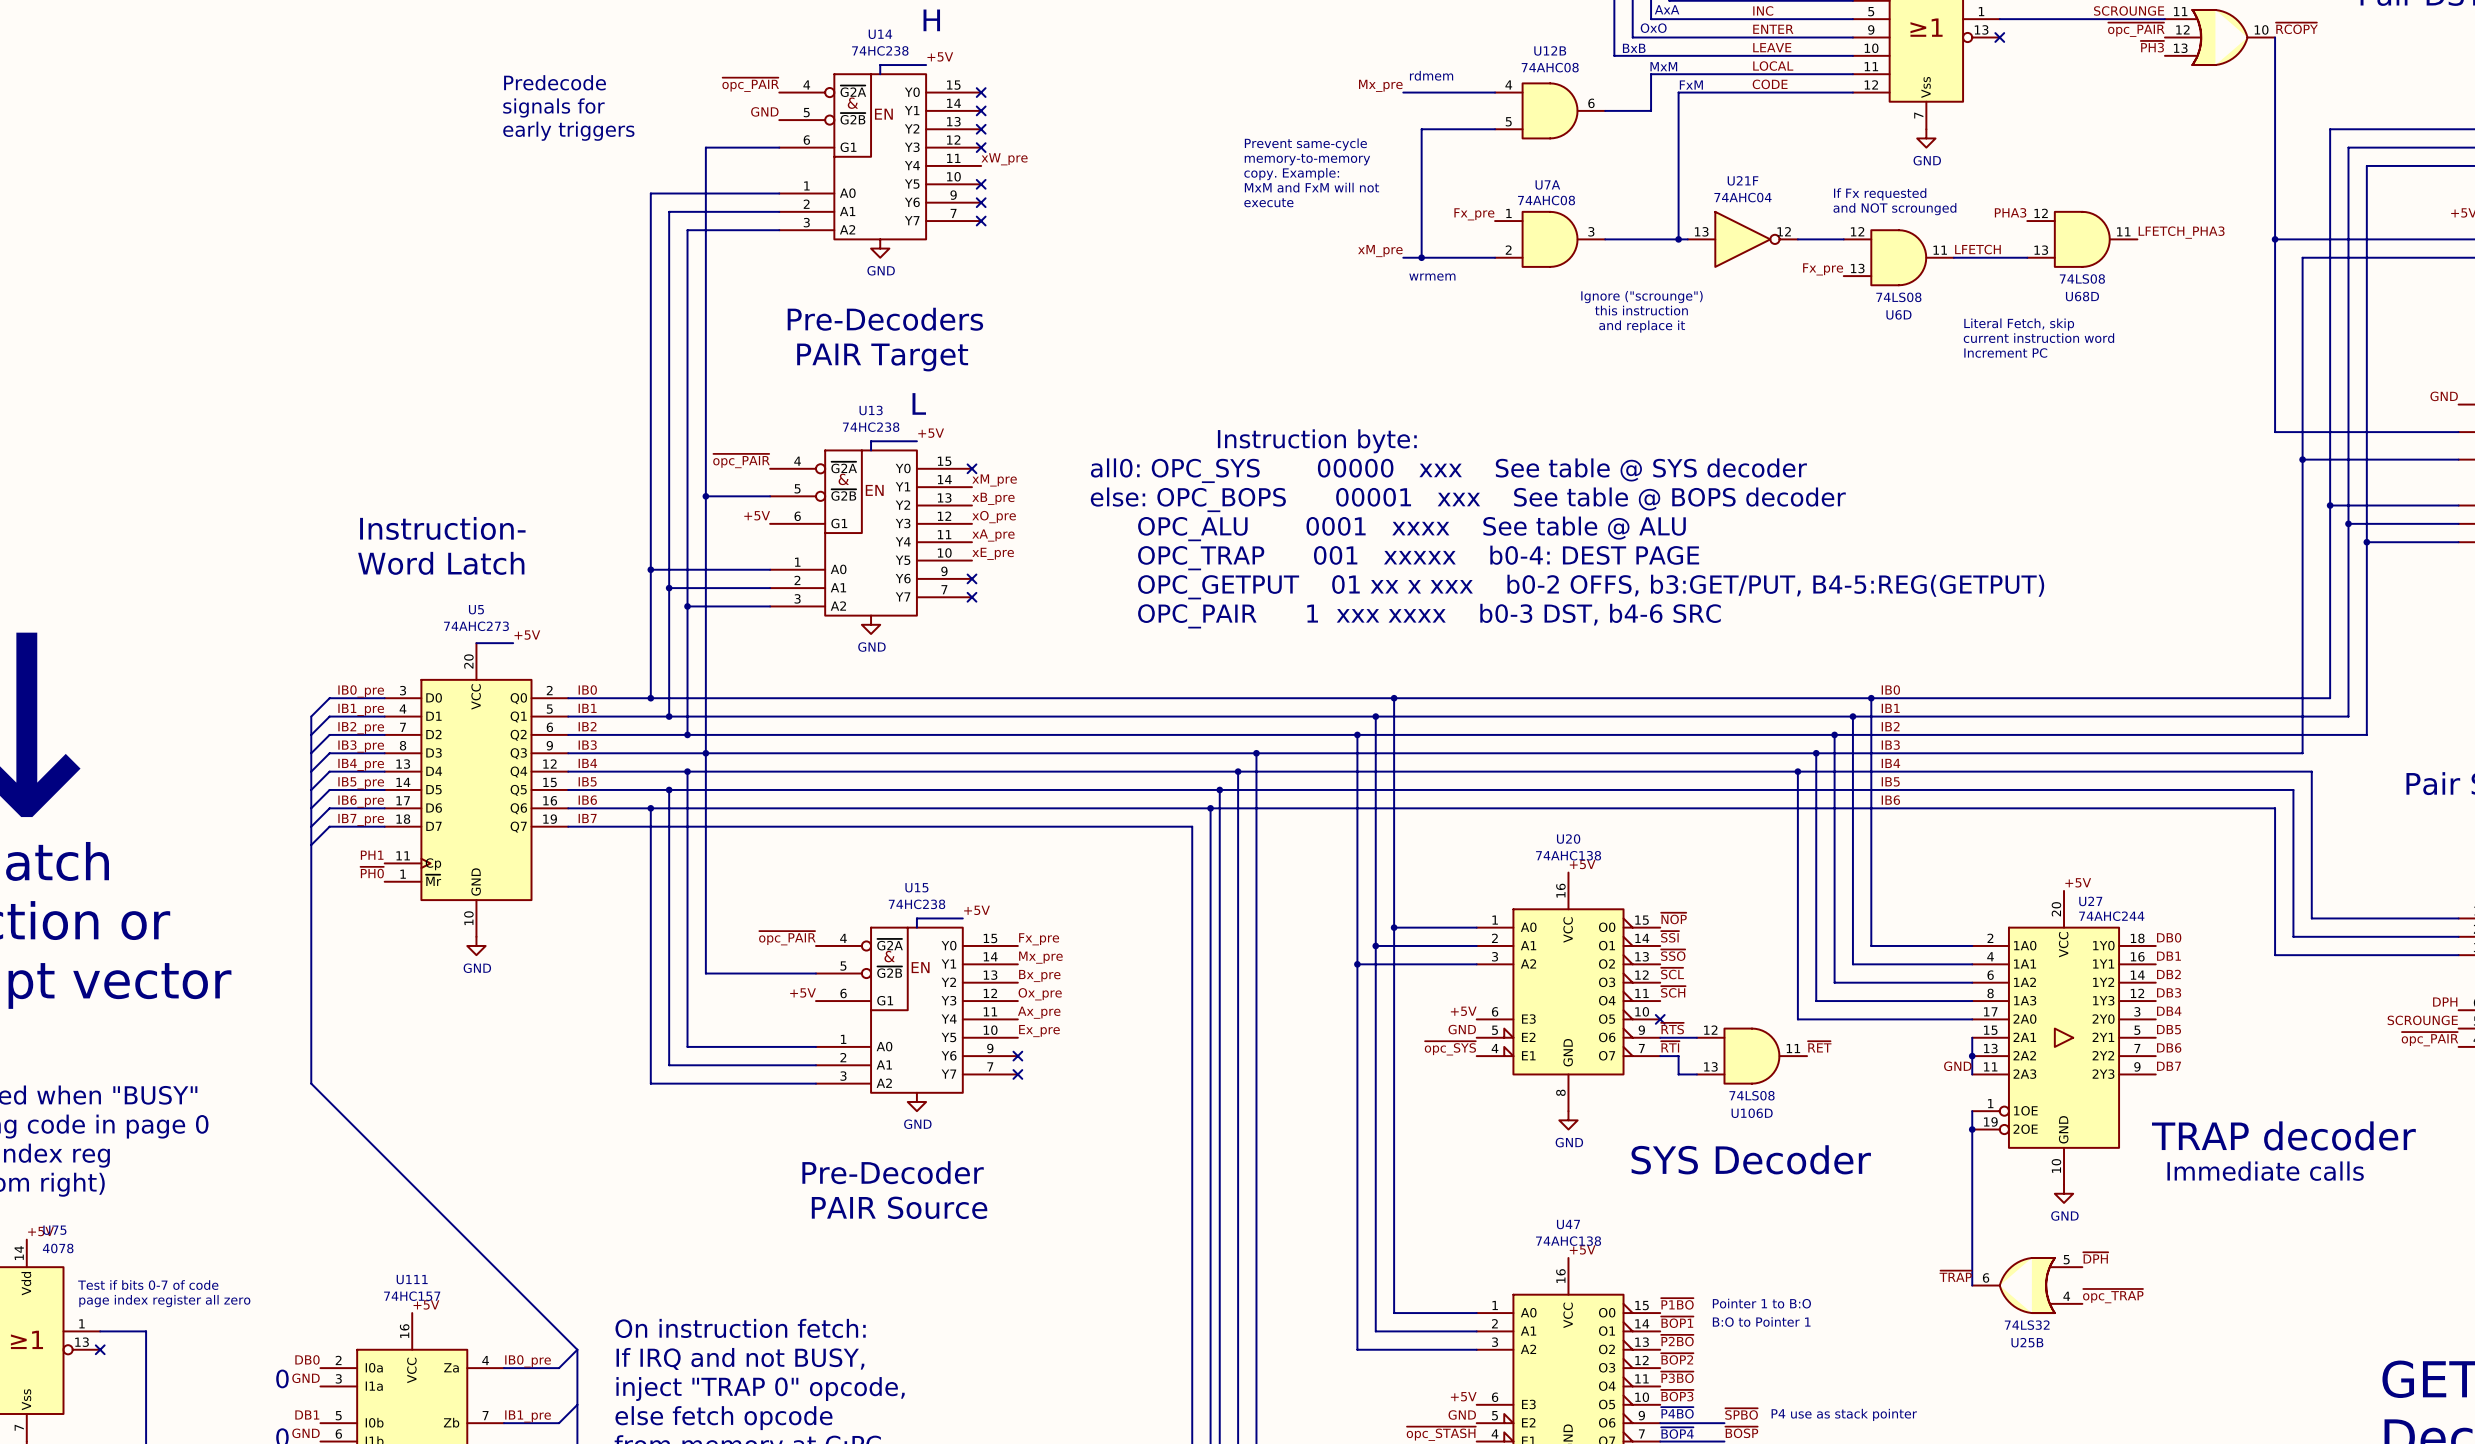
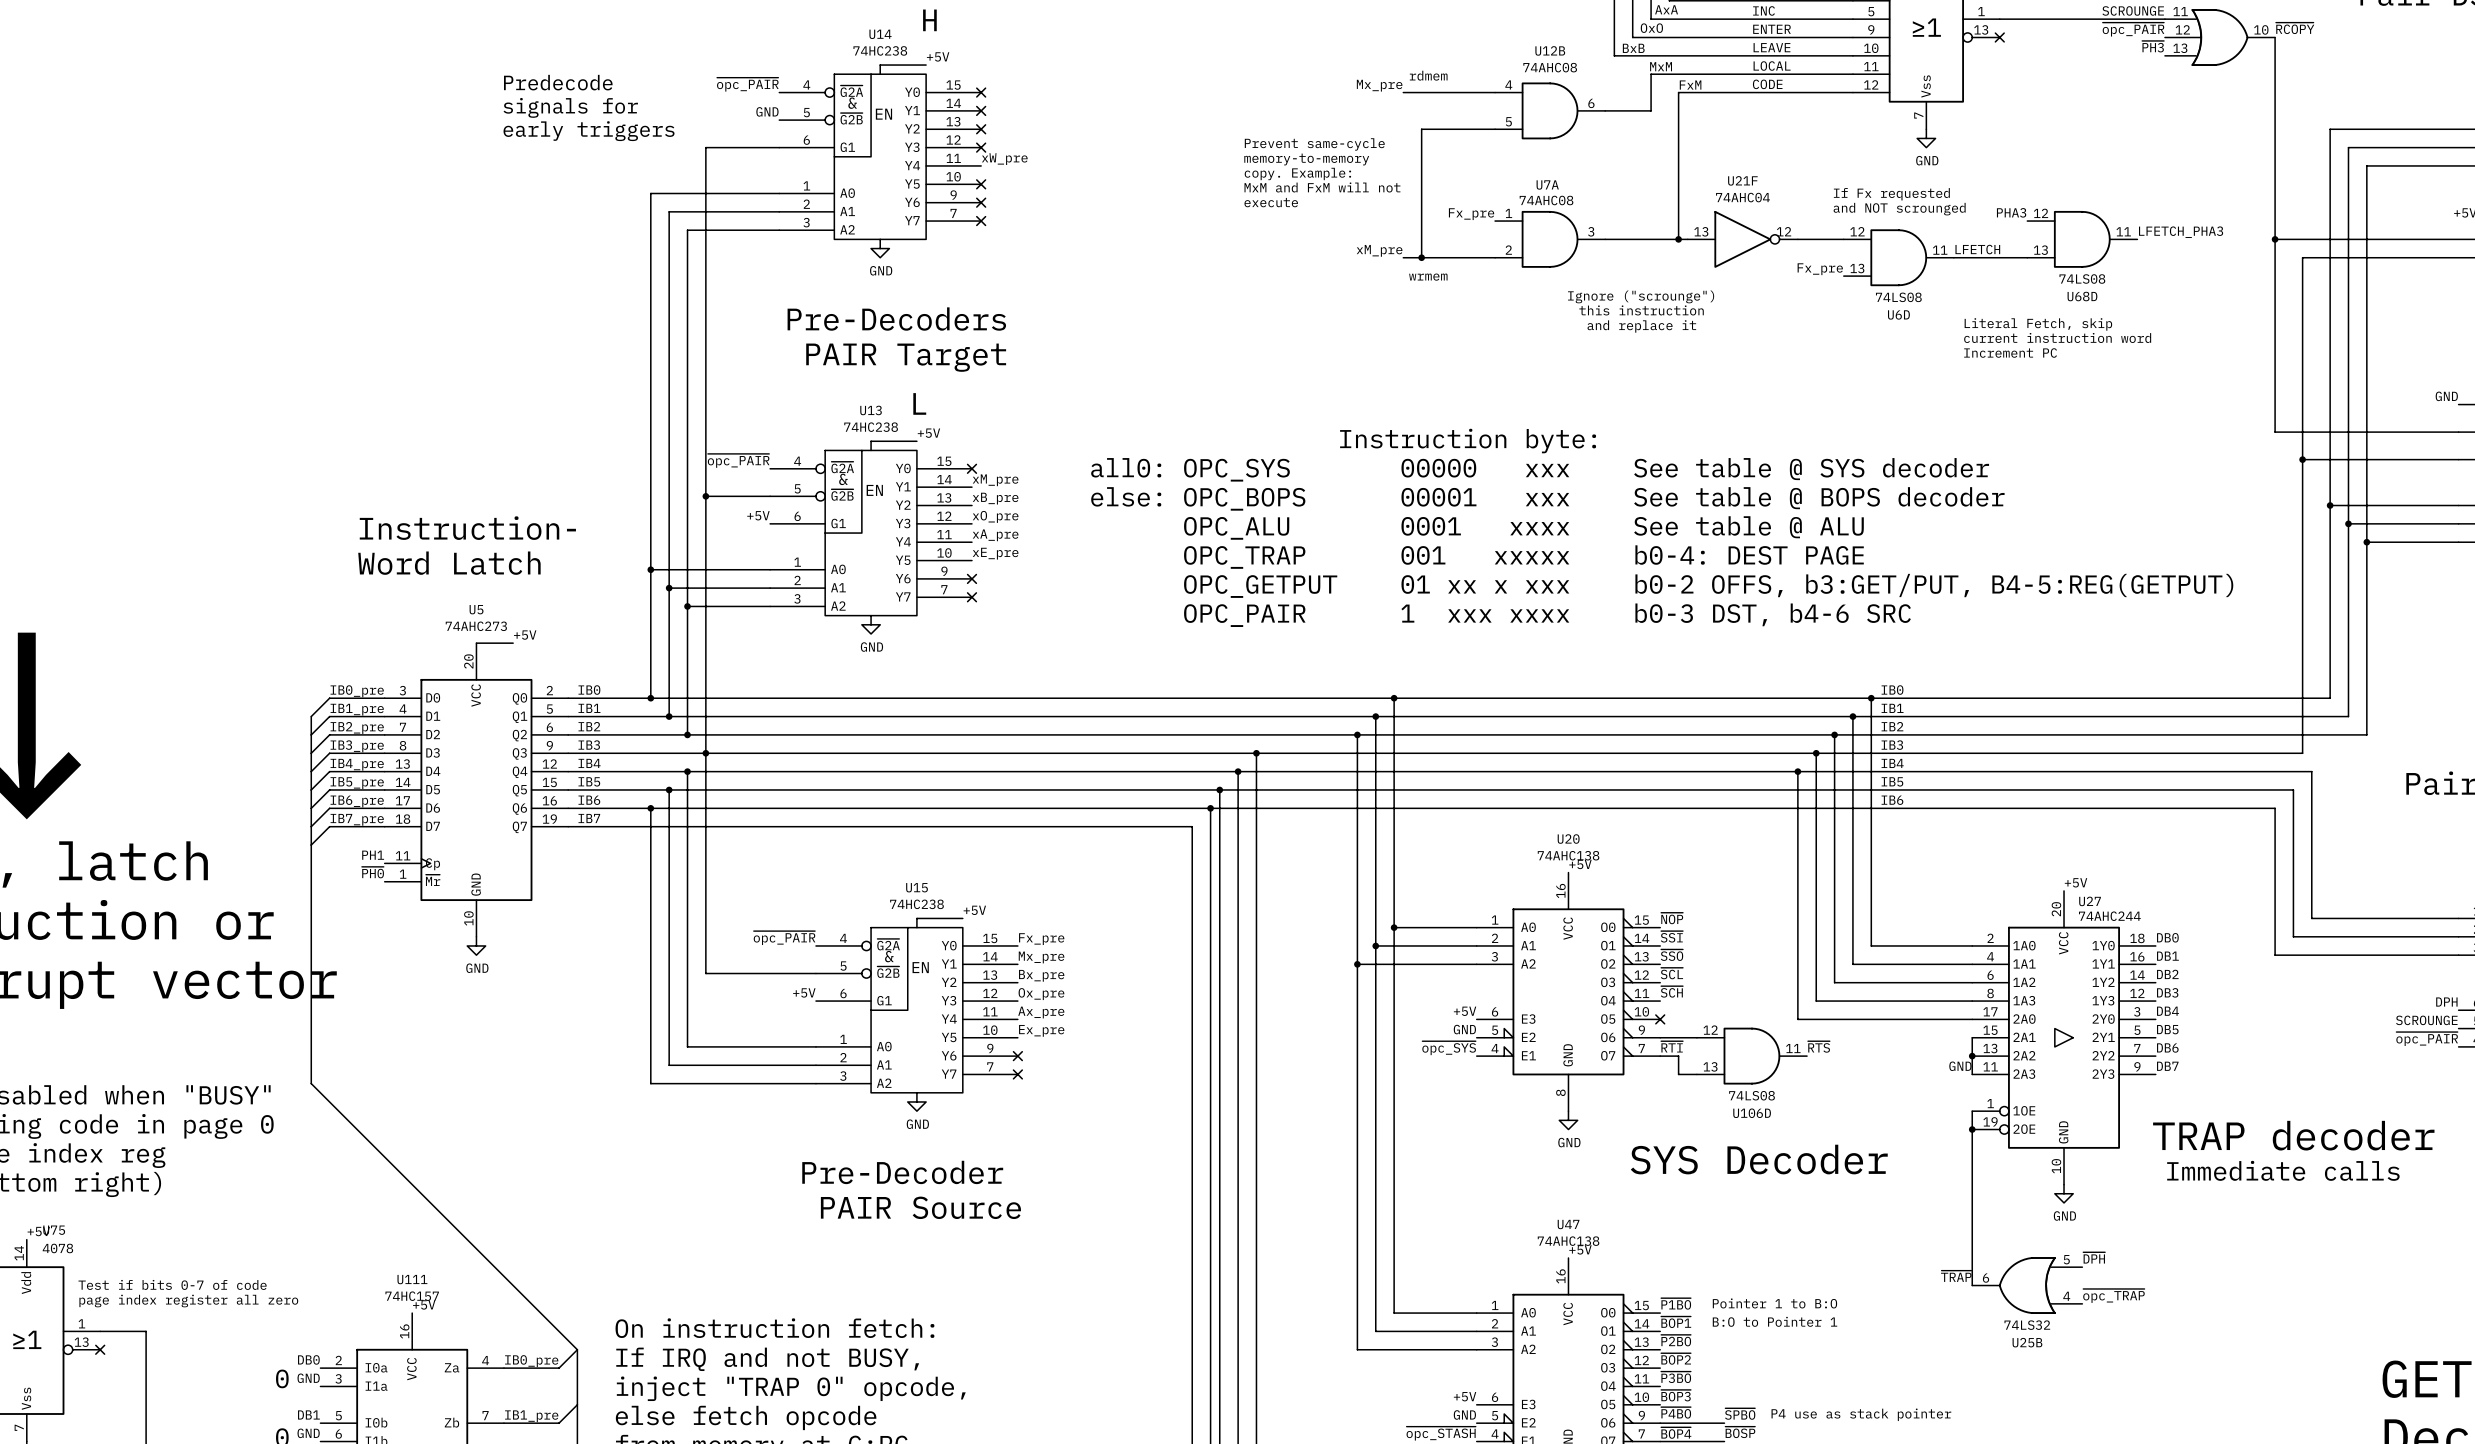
label: ~{RTS} (1672, 1028) -> none
label: ~{RET} (1819, 1046) -> ~{RTS} (1818, 1046)

